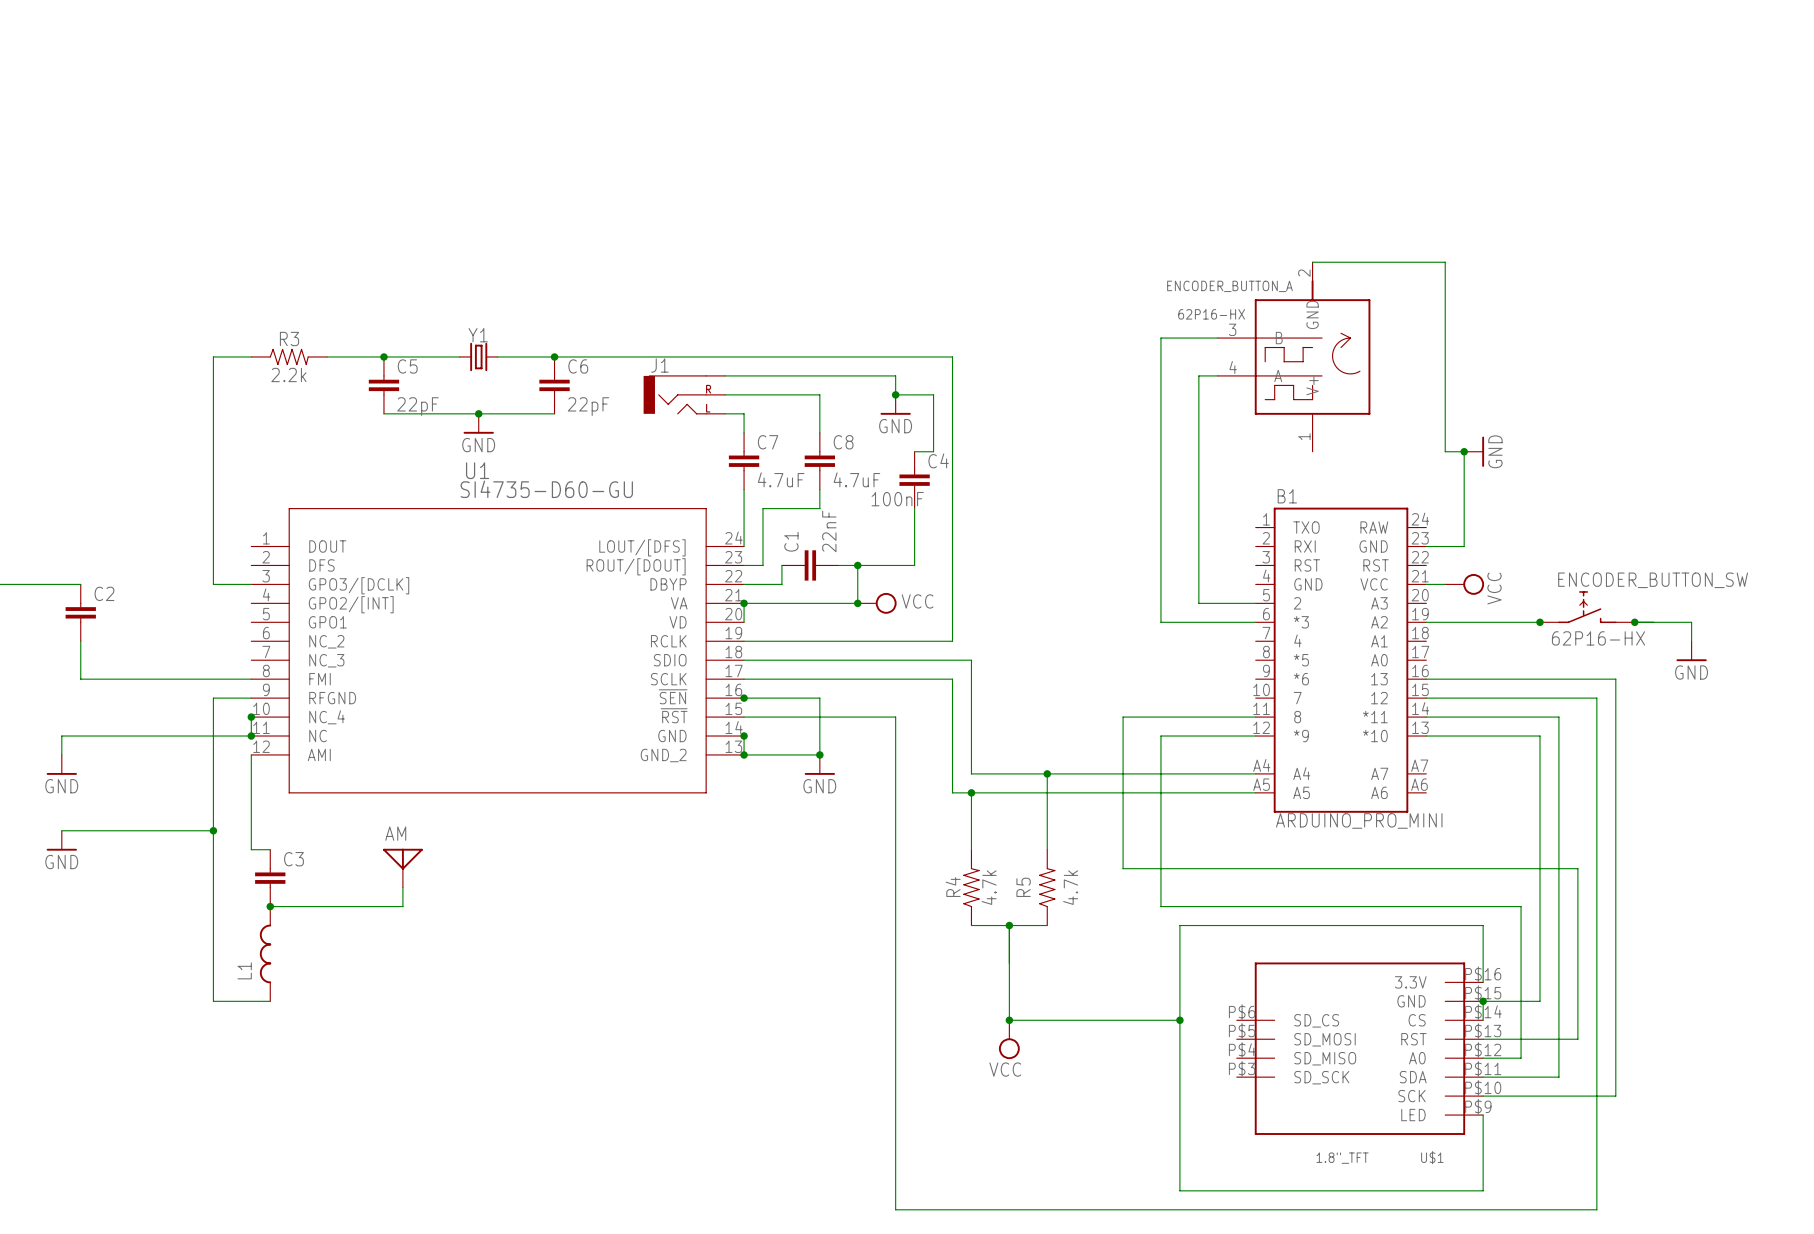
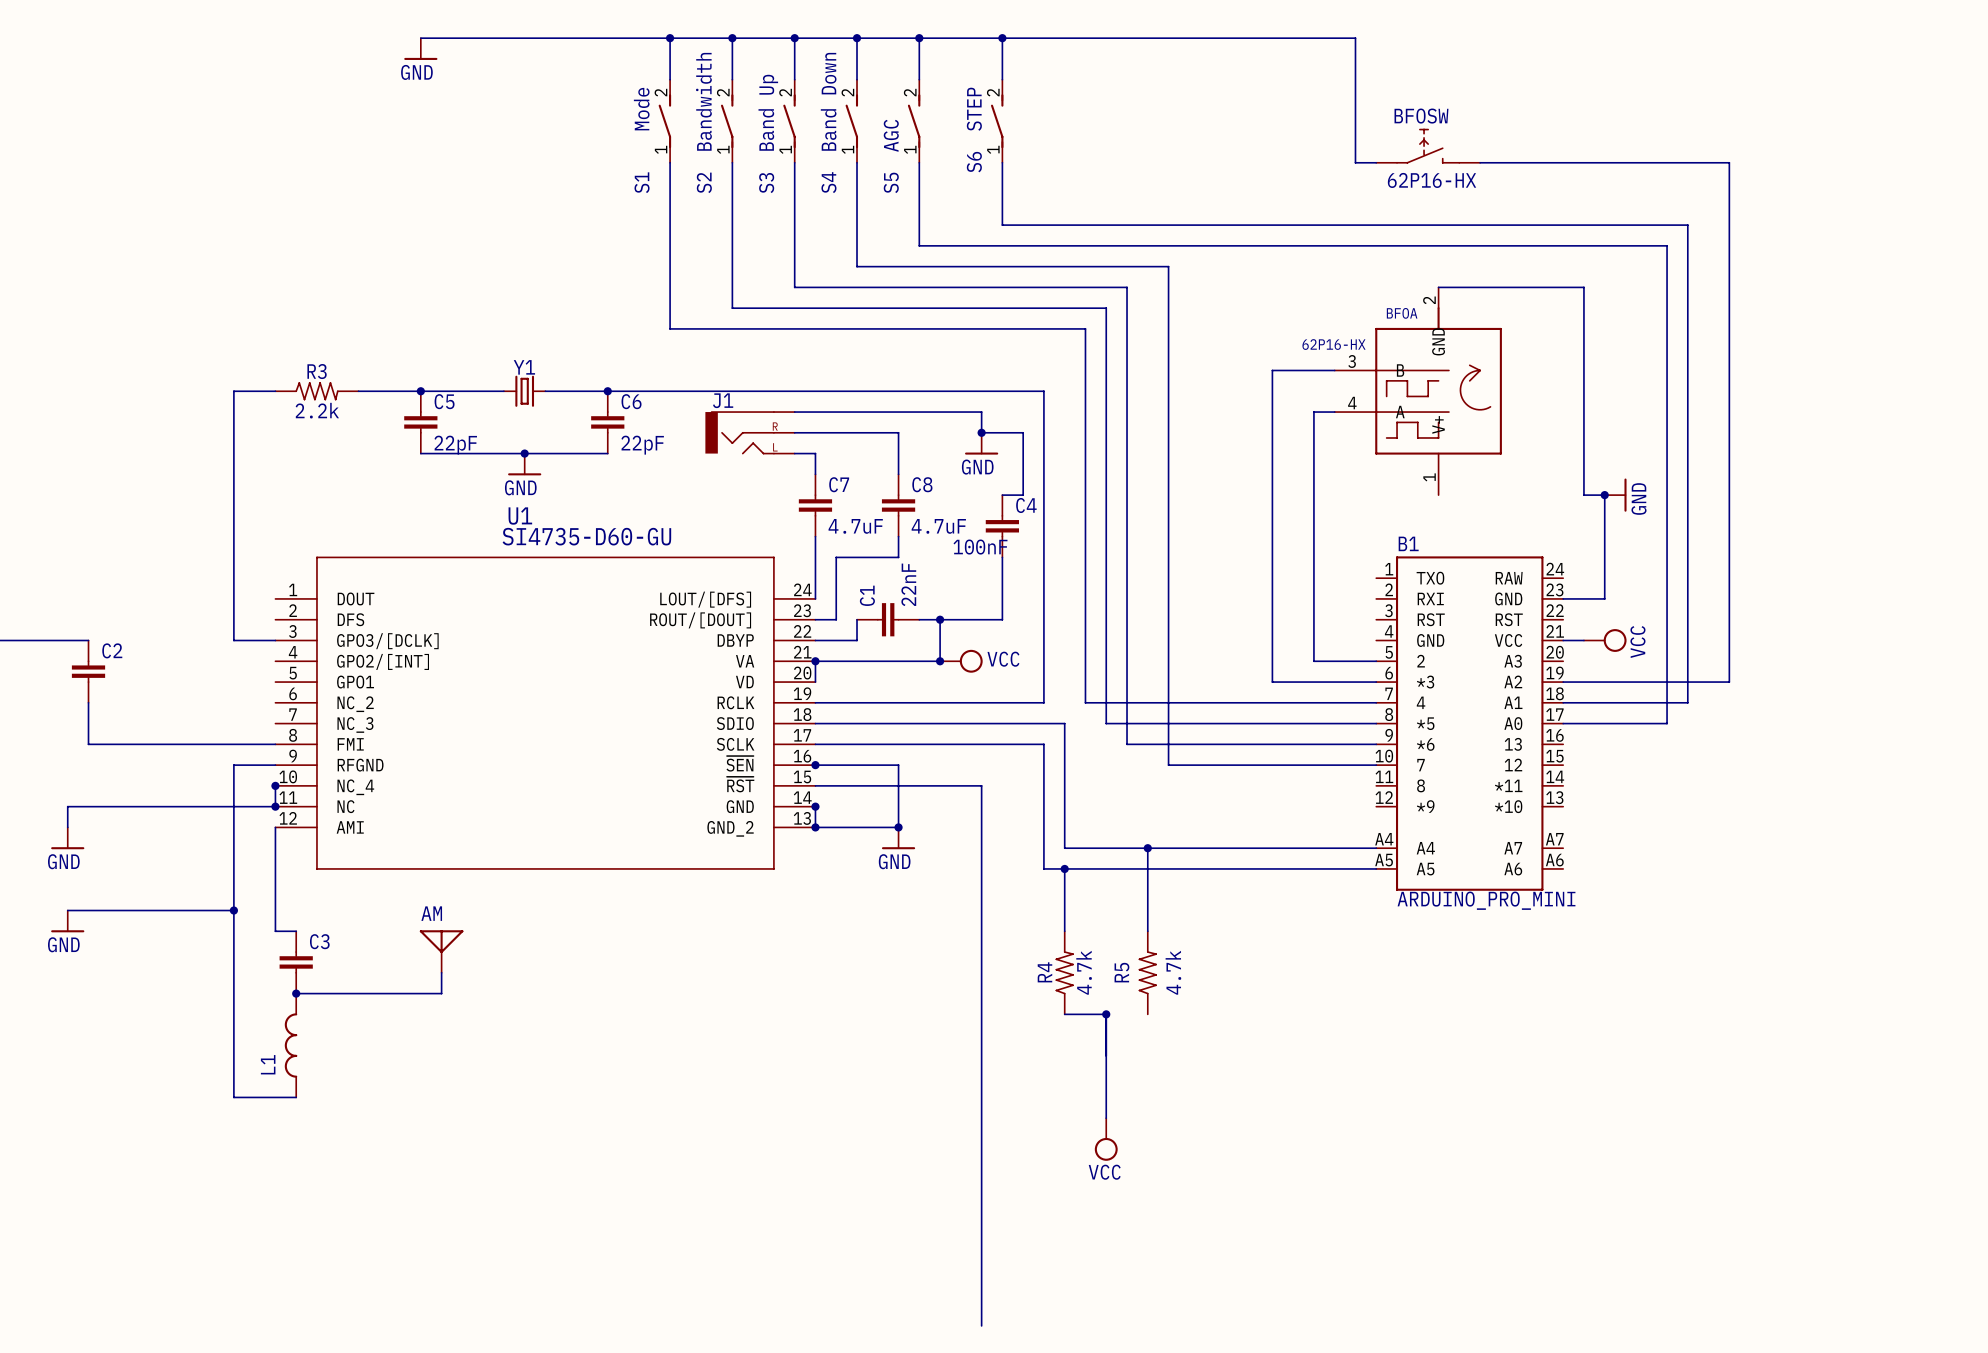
wire: none -> (420, 38) (1355, 38) (1355, 162) (1376, 162)
wire: none -> (670, 38) (670, 79)
junction: none -> (670, 38)
wire: none -> (732, 38) (732, 79)
junction: none -> (732, 38)
wire: none -> (794, 38) (794, 79)
junction: none -> (794, 38)
wire: none -> (857, 38) (857, 79)
junction: none -> (857, 38)
wire: none -> (919, 38) (919, 79)
junction: none -> (919, 38)
wire: none -> (1002, 38) (1002, 79)
junction: none -> (1002, 38)
power symbol: none -> GND (420, 49)
S1: none -> Mode (664, 121)
S2: none -> Bandwidth (727, 121)
S3: none -> Band Up (789, 121)
S4: none -> Band Down (851, 121)
S5: none -> AGC (914, 121)
S6: none -> STEP (997, 121)
BFOSW: none -> 62P16-HX (1428, 146)
wire: none -> (670, 162) (670, 328) (1085, 328) (1085, 702) (1376, 702)
wire: none -> (732, 162) (732, 308) (1106, 308) (1106, 723) (1376, 723)
wire: none -> (794, 162) (794, 287) (1127, 287) (1127, 744) (1376, 744)
wire: none -> (857, 162) (857, 266) (1168, 266) (1168, 765) (1376, 765)
wire: none -> (919, 162) (919, 245) (1667, 245) (1667, 723) (1563, 723)
wire: none -> (1002, 162) (1002, 225) (1687, 225) (1687, 702) (1563, 702)
wire: none -> (1480, 162) (1729, 162) (1729, 682) (1687, 682)
ENCODER_BUTTON_A name: ENCODER_BUTTON_A (1229, 286) -> BFOA (1402, 313)
ENCODER_BUTTON_SW: 62P16-HX (1587, 607) -> none
junction: (1539, 622) -> none
wire: (1634, 622) (1691, 622) (1691, 641) -> none
junction: (1634, 622) -> none
power symbol: GND (1691, 651) -> none
wire: (1426, 679) (1615, 679) (1615, 1096) (1483, 1096) -> none
wire: (1426, 698) (1596, 698) (1596, 1209) (895, 1209) -> none
wire: (1255, 717) (1123, 717) (1123, 868) (1577, 868) (1577, 1039) (1483, 1039) -> none
wire: (1426, 717) (1558, 717) (1558, 1077) (1483, 1077) -> none
wire: (1255, 736) (1160, 736) (1160, 906) (1521, 906) (1521, 1058) (1483, 1058) -> none
wire: (1426, 736) (1539, 736) (1539, 1001) (1483, 1001) (1483, 1020) -> none
wire: (1009, 925) (1047, 925) -> none
wire: (1483, 982) (1483, 925) (1179, 925) (1179, 1190) (1483, 1190) (1483, 1115) -> none
junction: (1483, 1001) -> none
wire: (1009, 1020) (1179, 1020) -> none
junction: (1009, 1020) -> none
junction: (1179, 1020) -> none
U$1: 1.8"_TFT (1359, 1048) -> none

